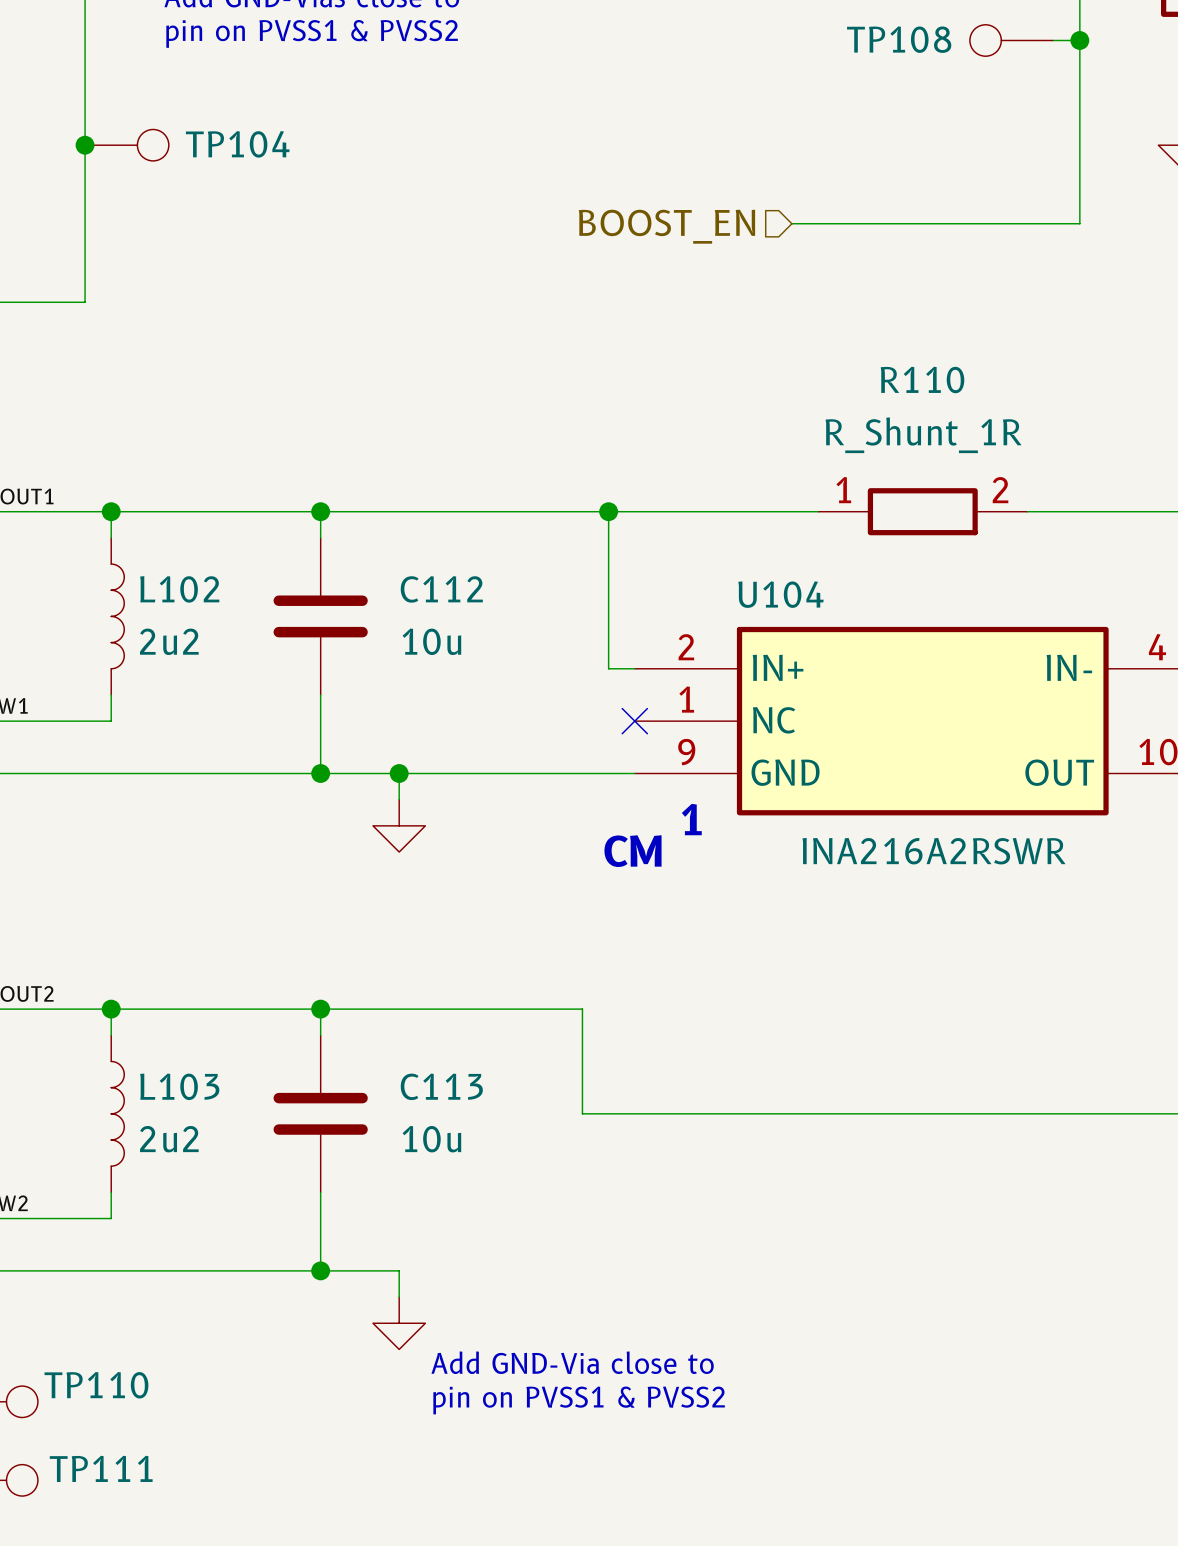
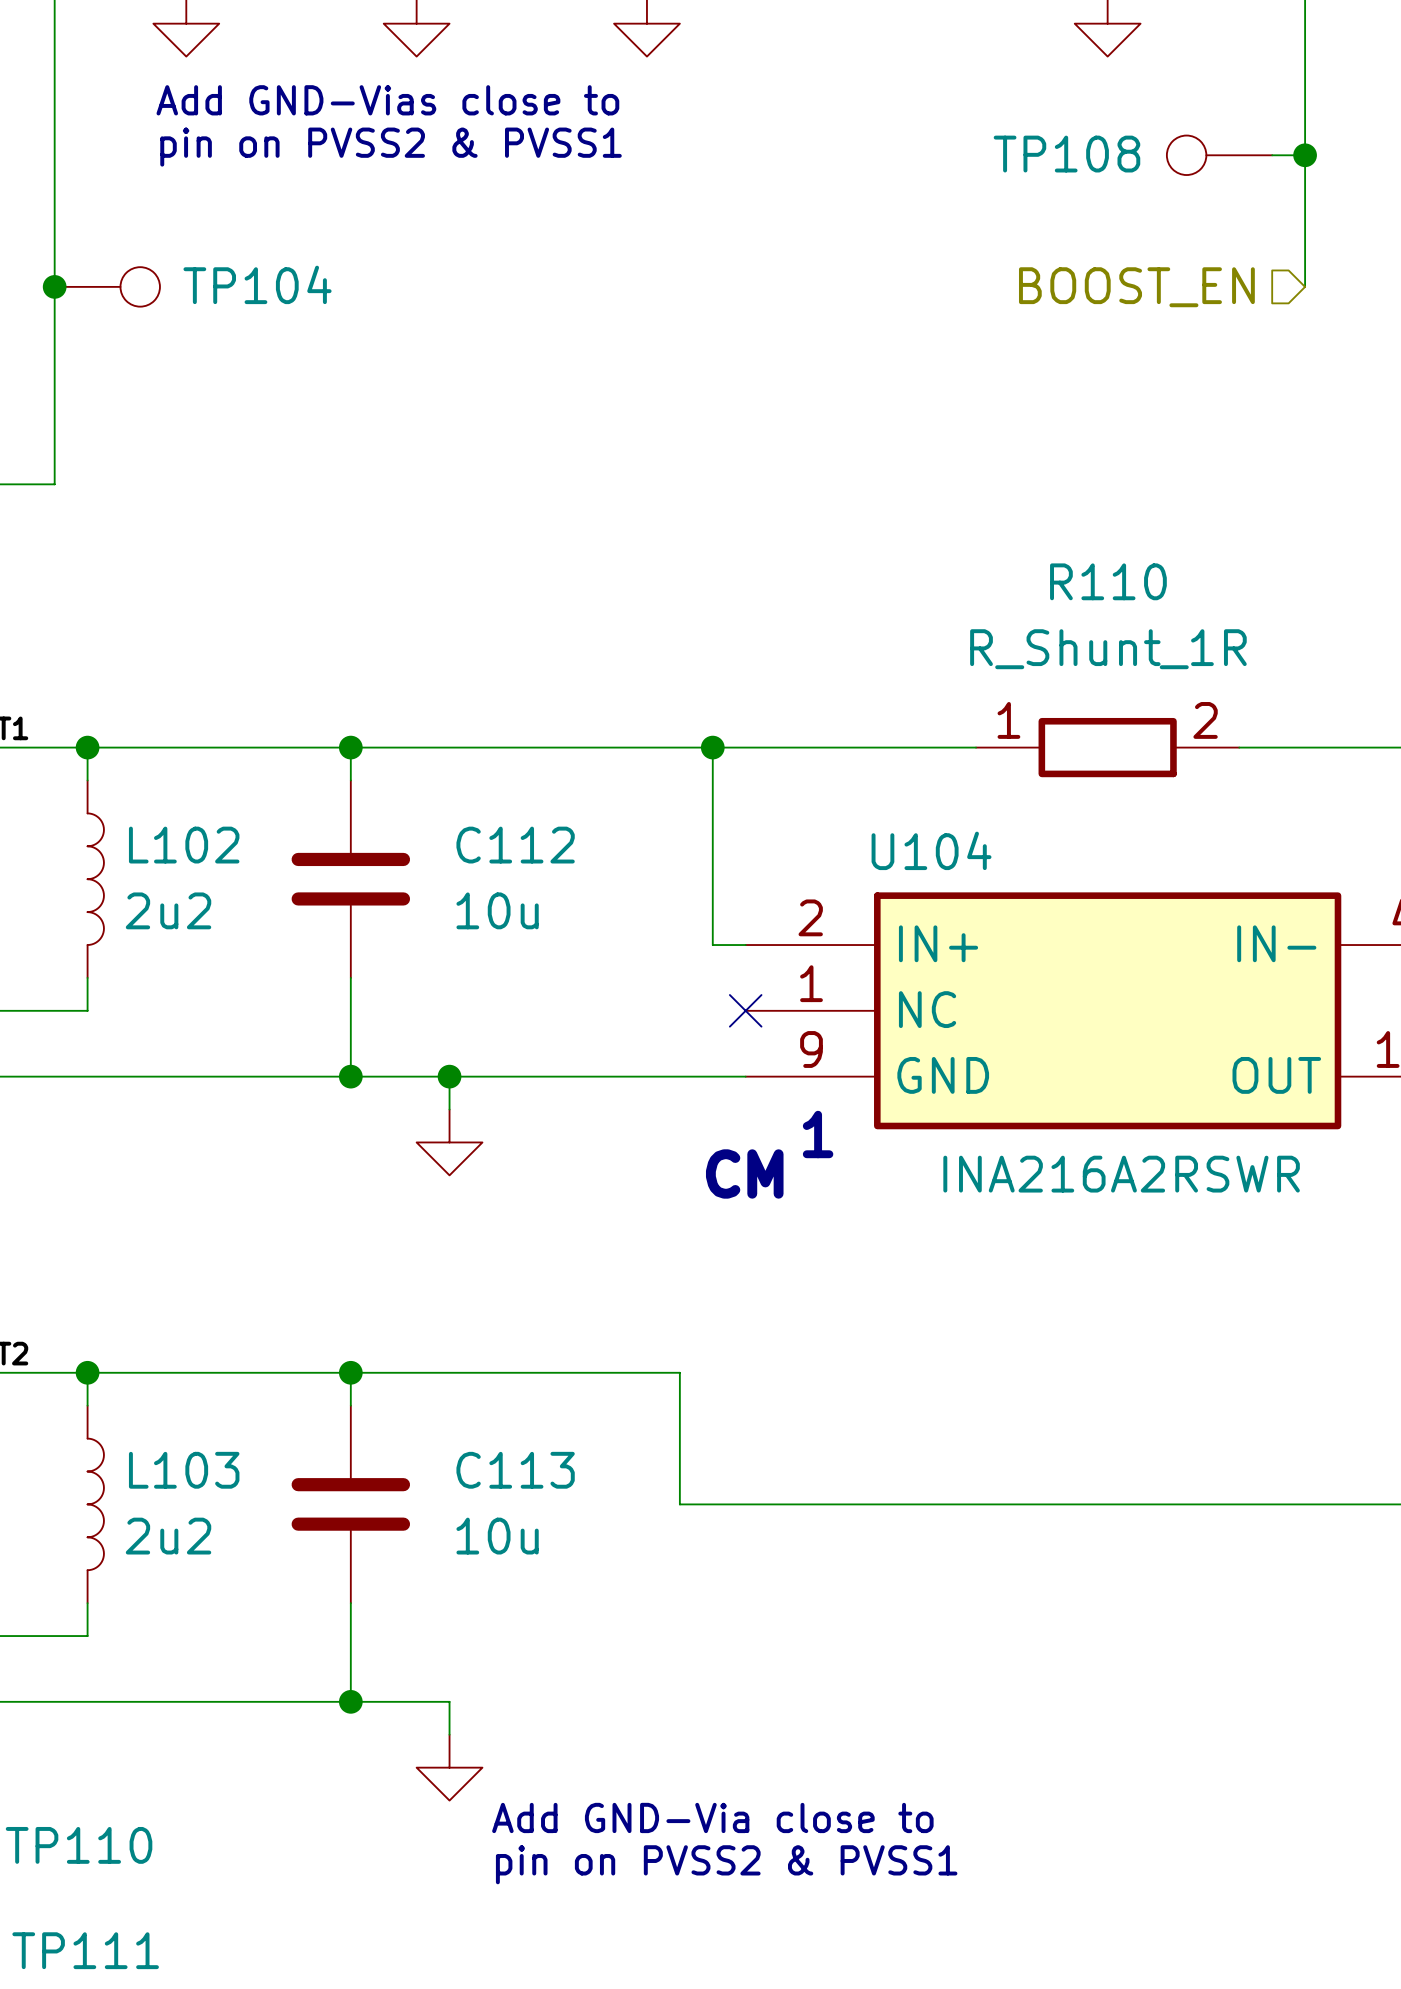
text: pin on PVSS1 & PVSS2 (312, 33) -> pin on PVSS2 & PVSS1 (391, 147)
wire: (1079, 145) (1079, 223) (791, 223) -> none
hierarchical label position: BOOST_EN (666, 226) -> BOOST_EN (1136, 287)
text: pin on PVSS1 & PVSS2 (579, 1400) -> pin on PVSS2 & PVSS1 (726, 1864)

